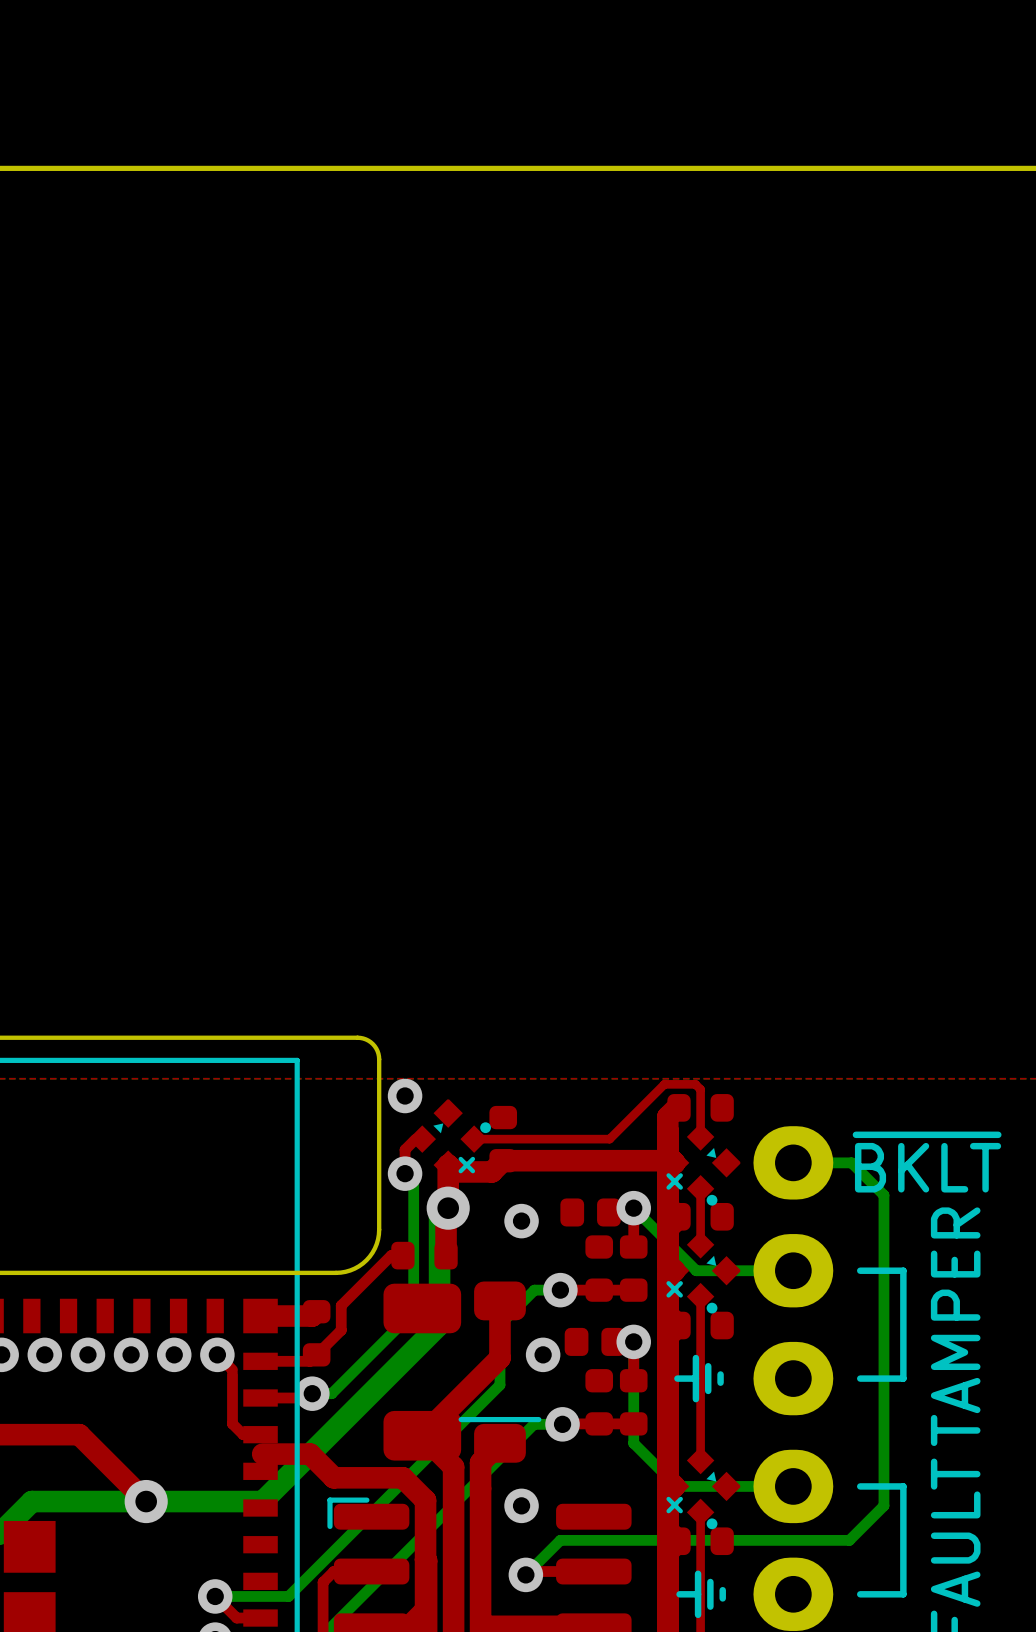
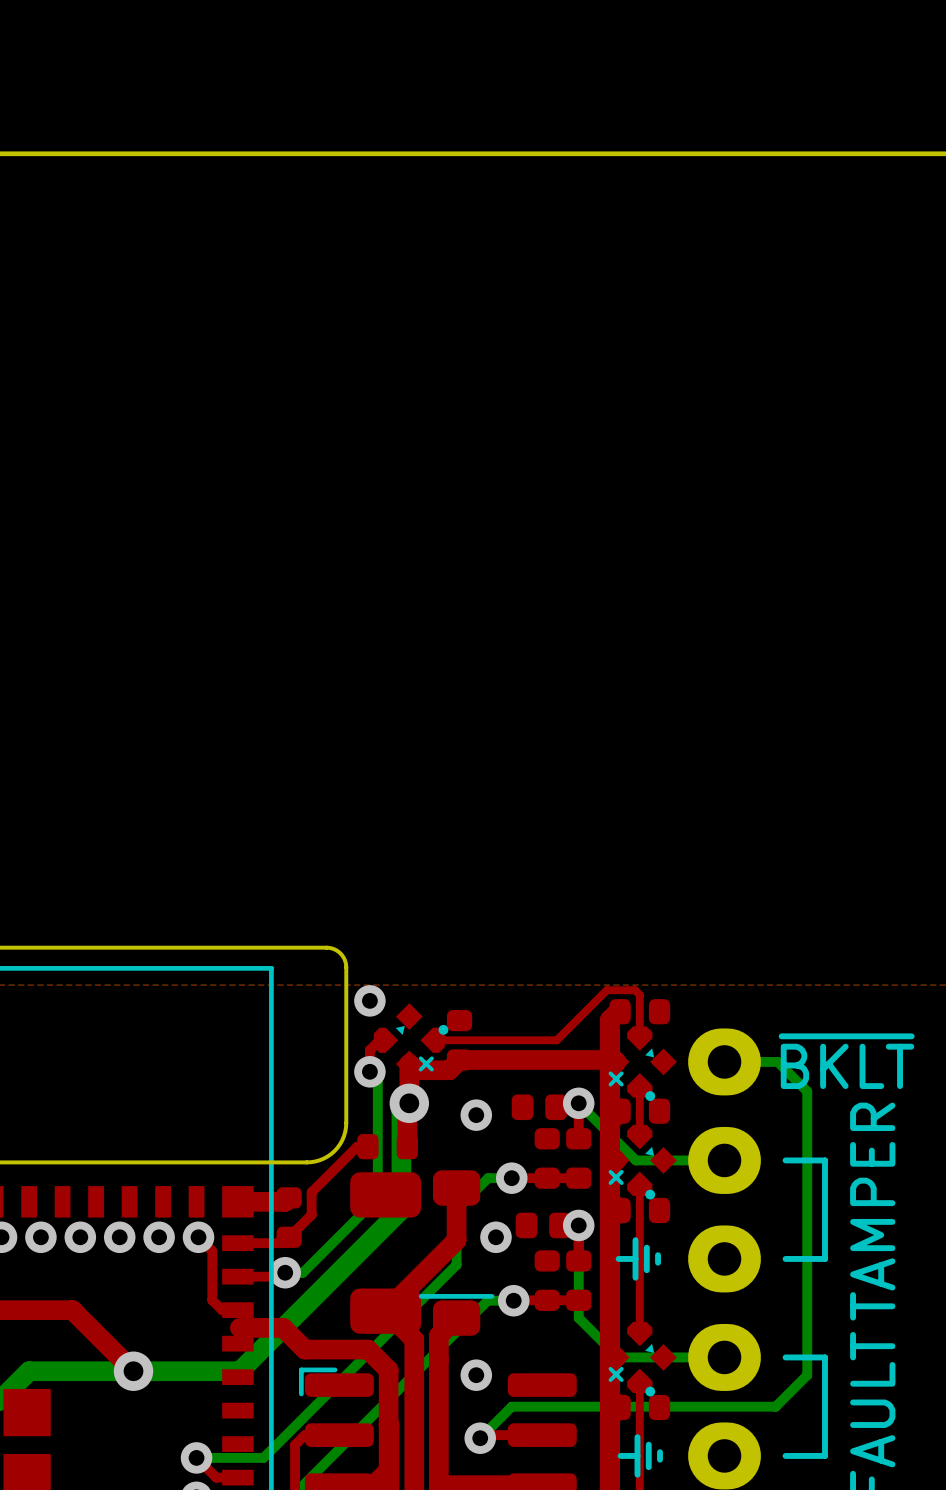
part footprint: [409, 1099, 491, 1179] -> [373, 1003, 449, 1078]
part footprint: [660, 1124, 741, 1206] -> [602, 1026, 677, 1102]
part footprint: [660, 1231, 741, 1314] -> [602, 1124, 677, 1200]
part footprint: [660, 1447, 741, 1530] -> [602, 1321, 677, 1397]

